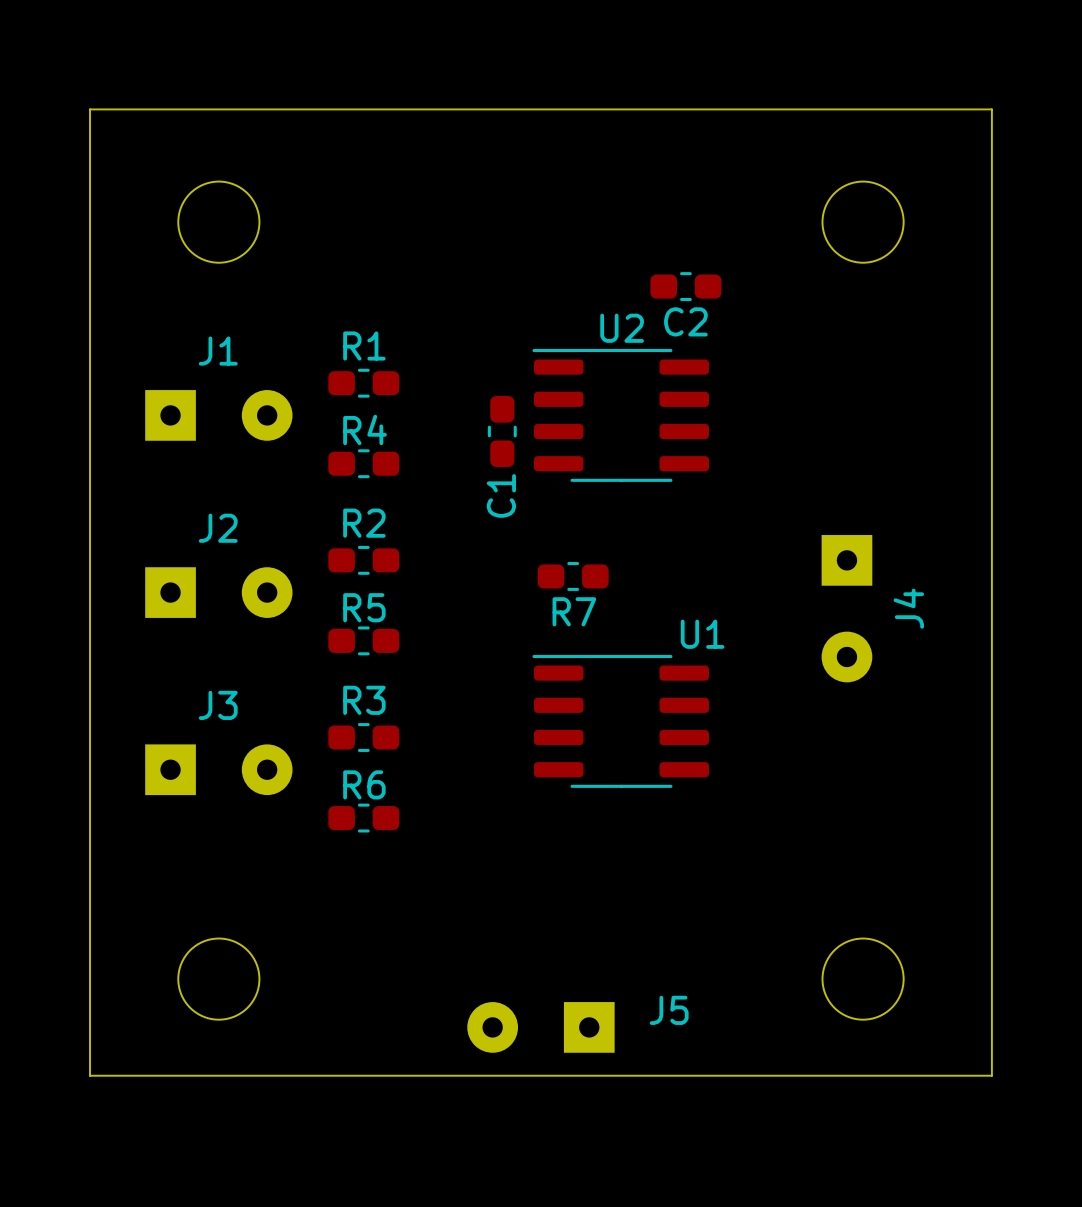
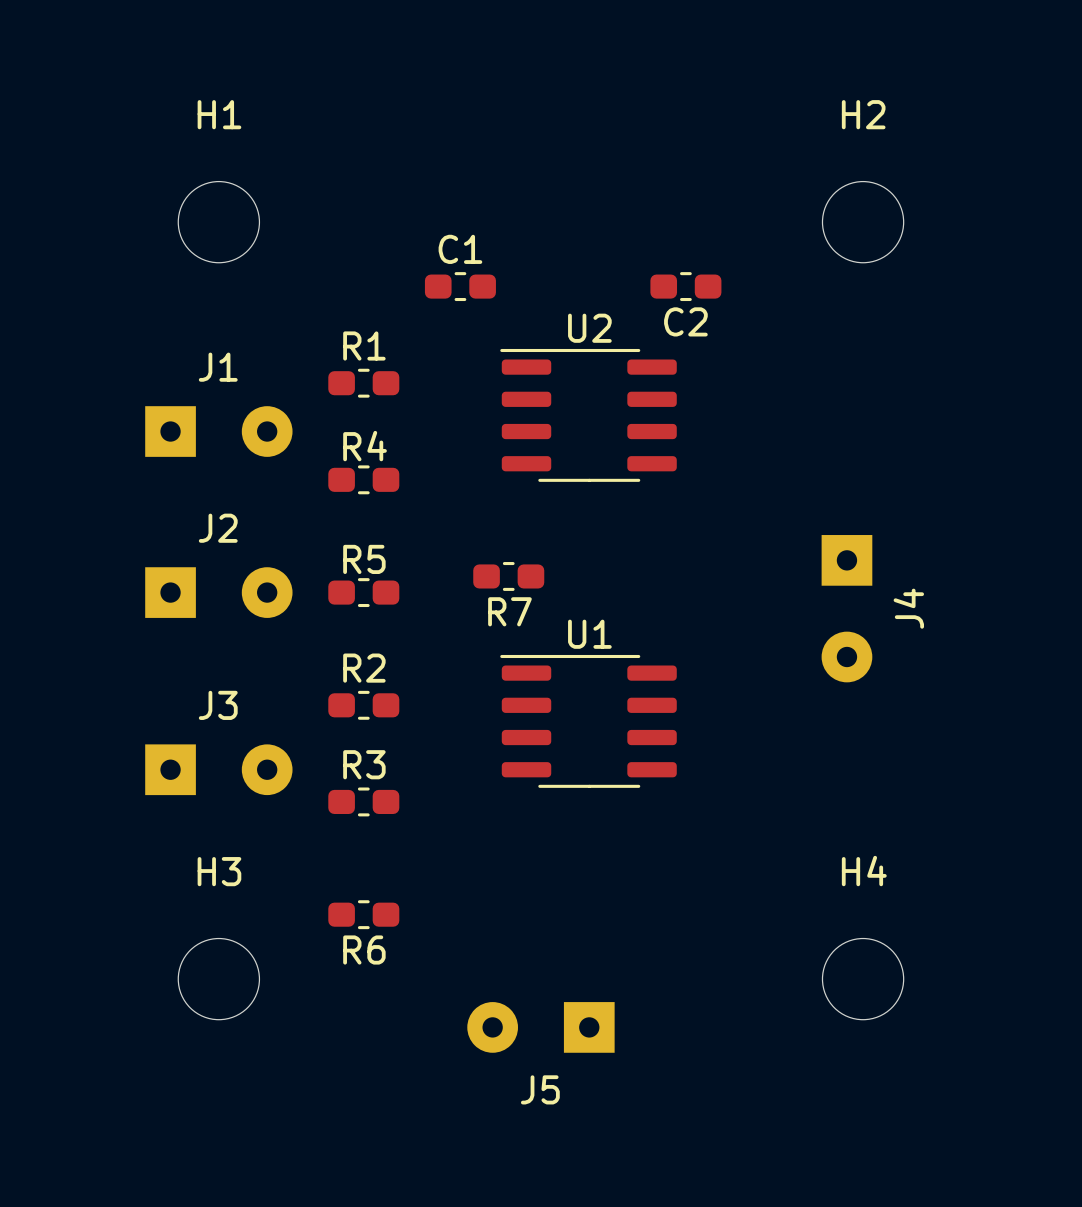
board edge: (90, 109) (90, 1075) (991, 1075) (991, 109) (90, 109) -> none
H1 name: none -> H1 (219, 114)
H2 name: none -> H2 (863, 114)
J1 position: (218, 415) -> (218, 431)
U2 position: (620, 415) -> (588, 415)
C1 rotation: 0° (502, 431) -> 90° clockwise (460, 286)
C1 position: (502, 431) -> (460, 286)
R4 position: (363, 463) -> (363, 479)
C1 name position: C1 (501, 495) -> C1 (460, 249)
R2 position: (363, 560) -> (363, 705)
R7 position: (573, 576) -> (508, 576)
U1 name position: U1 (702, 634) -> U1 (589, 634)
R5 position: (363, 640) -> (363, 592)
U1 position: (620, 721) -> (588, 721)
R3 position: (363, 737) -> (363, 801)
R6 name position: R6 (364, 784) -> R6 (364, 950)
R6 position: (363, 818) -> (363, 914)
H3 name: none -> H3 (219, 871)
H4 name: none -> H4 (864, 871)
J5 name position: J5 (669, 1010) -> J5 (540, 1089)

